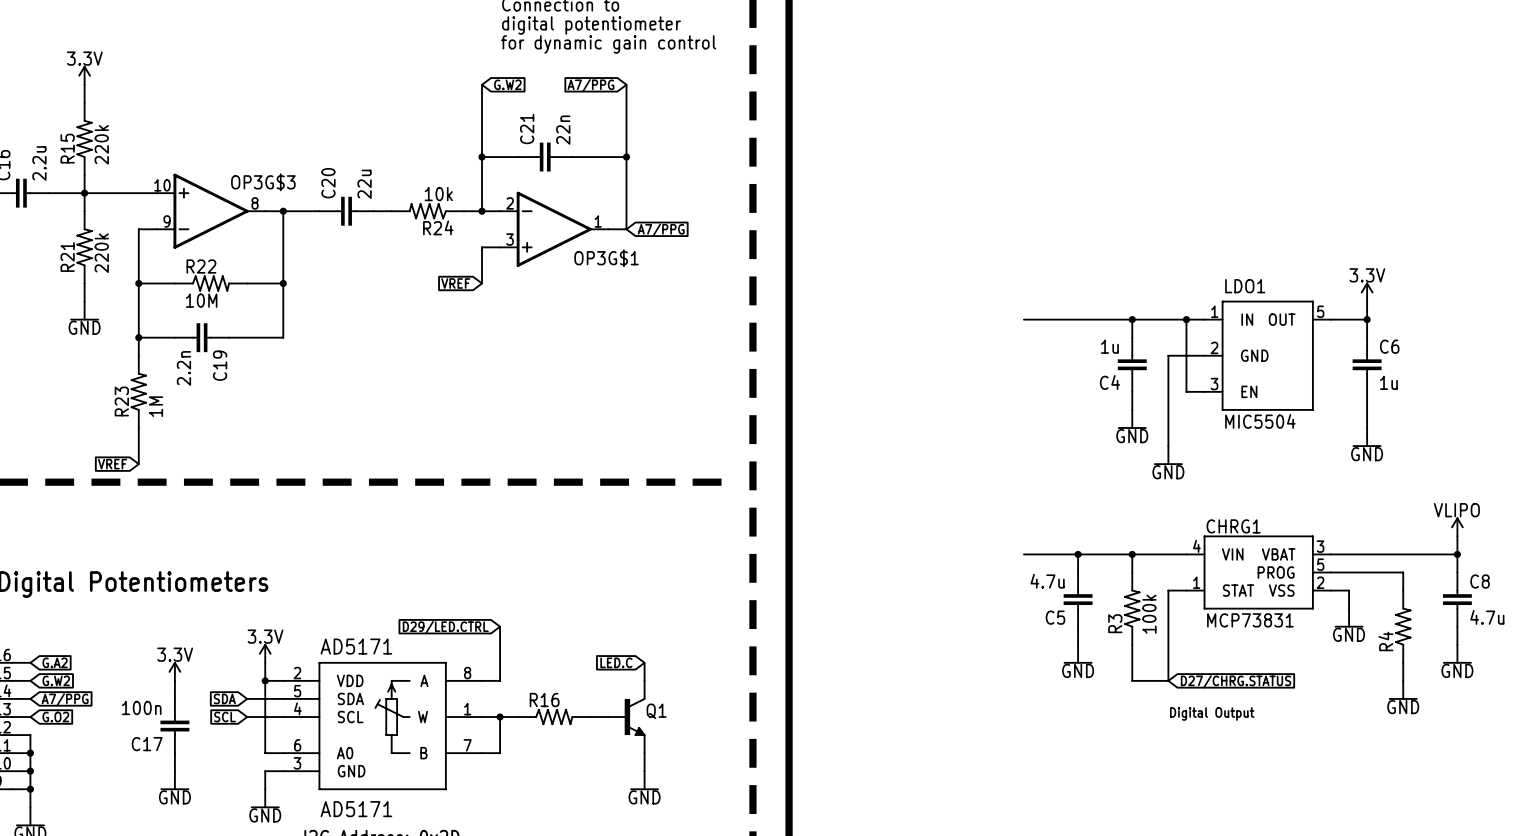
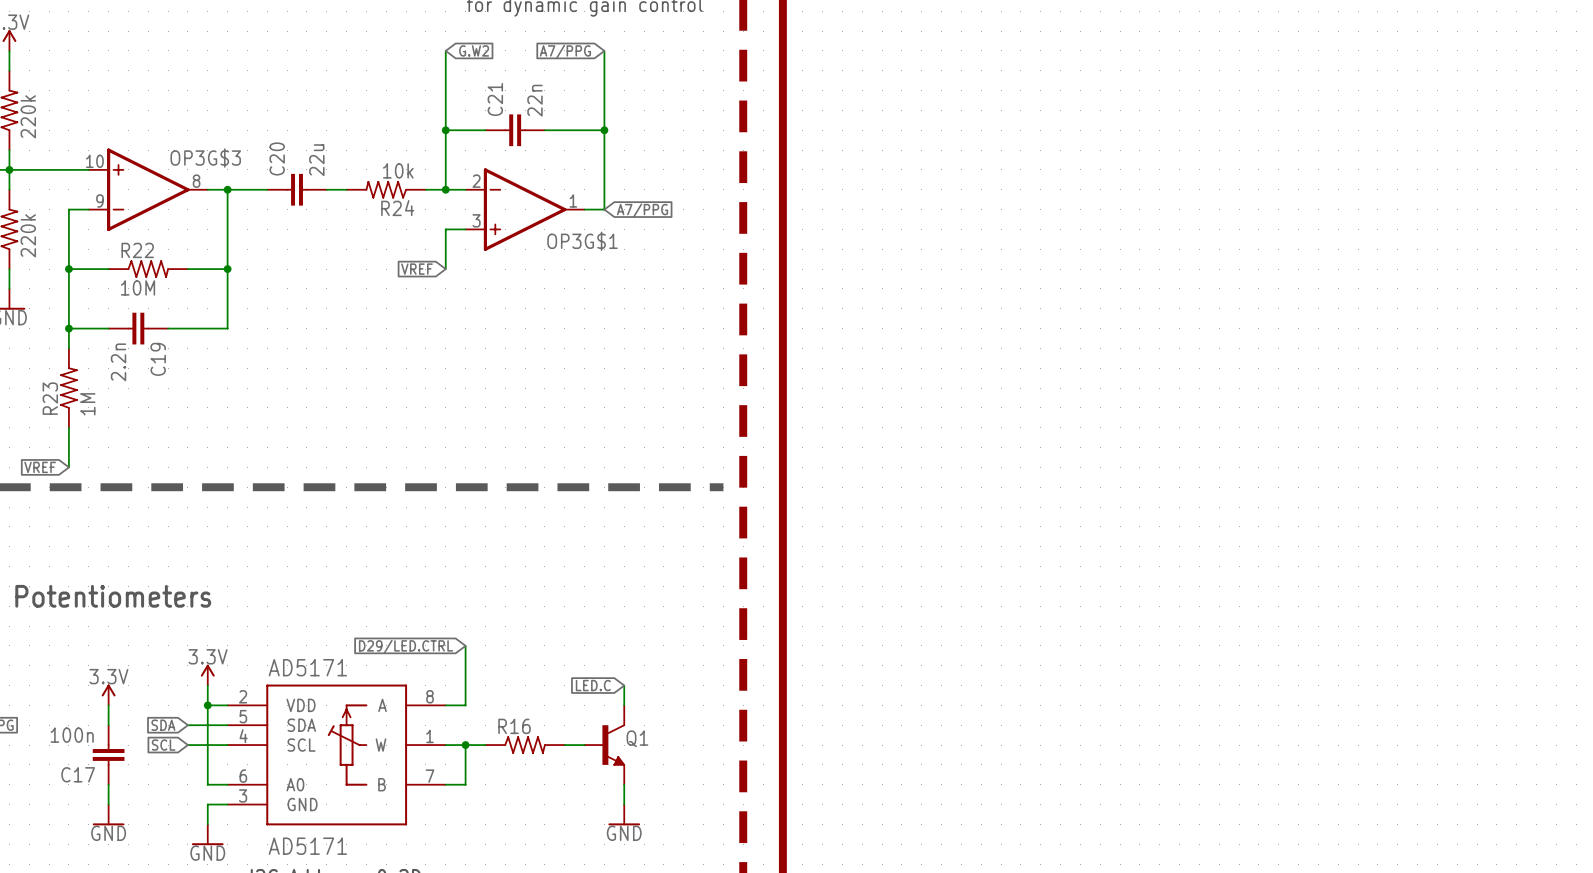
power symbol: 3.3V (1367, 292) -> none
wire: (1367, 301) (1367, 337) -> none
wire: (1023, 319) (1204, 319) -> none
wire: (1132, 319) (1132, 337) -> none
junction: (1132, 319) -> none
wire: (1186, 319) (1186, 391) (1204, 391) -> none
junction: (1186, 319) -> none
wire: (1330, 319) (1367, 319) -> none
junction: (1367, 319) -> none
wire: (1204, 355) (1168, 355) (1168, 446) -> none
LDO1: MIC5504 (1267, 355) -> none
C4: 1u (1132, 364) -> none
C6: 1u (1367, 364) -> none
wire: (1132, 391) (1132, 409) -> none
wire: (1367, 391) (1367, 427) -> none
power symbol: GND (1132, 419) -> none
power symbol: GND (1367, 437) -> none
power symbol: GND (1168, 455) -> none
power symbol: VLIPO (1457, 526) -> none
wire: (1457, 536) (1457, 572) -> none
wire: (1023, 554) (1186, 554) -> none
wire: (1078, 554) (1078, 572) -> none
junction: (1078, 554) -> none
wire: (1132, 554) (1132, 572) -> none
junction: (1132, 554) -> none
wire: (1330, 554) (1457, 554) -> none
junction: (1457, 554) -> none
CHRG1: MCP73831 (1258, 572) -> none
wire: (1330, 572) (1403, 572) (1403, 590) -> none
wire: (1186, 590) (1168, 590) (1168, 680) (1132, 680) (1132, 644) -> none
wire: (1330, 590) (1349, 590) (1349, 608) -> none
C5: 4.7u (1078, 599) -> none
C8: 4.7u (1457, 599) -> none
R3: 100k (1132, 608) -> none
power symbol: GND (1349, 618) -> none
wire: (1078, 626) (1078, 644) -> none
R4: (1403, 626) -> none
wire: (1457, 626) (1457, 644) -> none
power symbol: GND (1078, 654) -> none
power symbol: GND (1457, 654) -> none
wire: (1403, 662) (1403, 680) -> none
global label: D27/CHRG.STATUS (1236, 681) -> none
power symbol: GND (1403, 690) -> none
text: Digital Output (1212, 713) -> none

